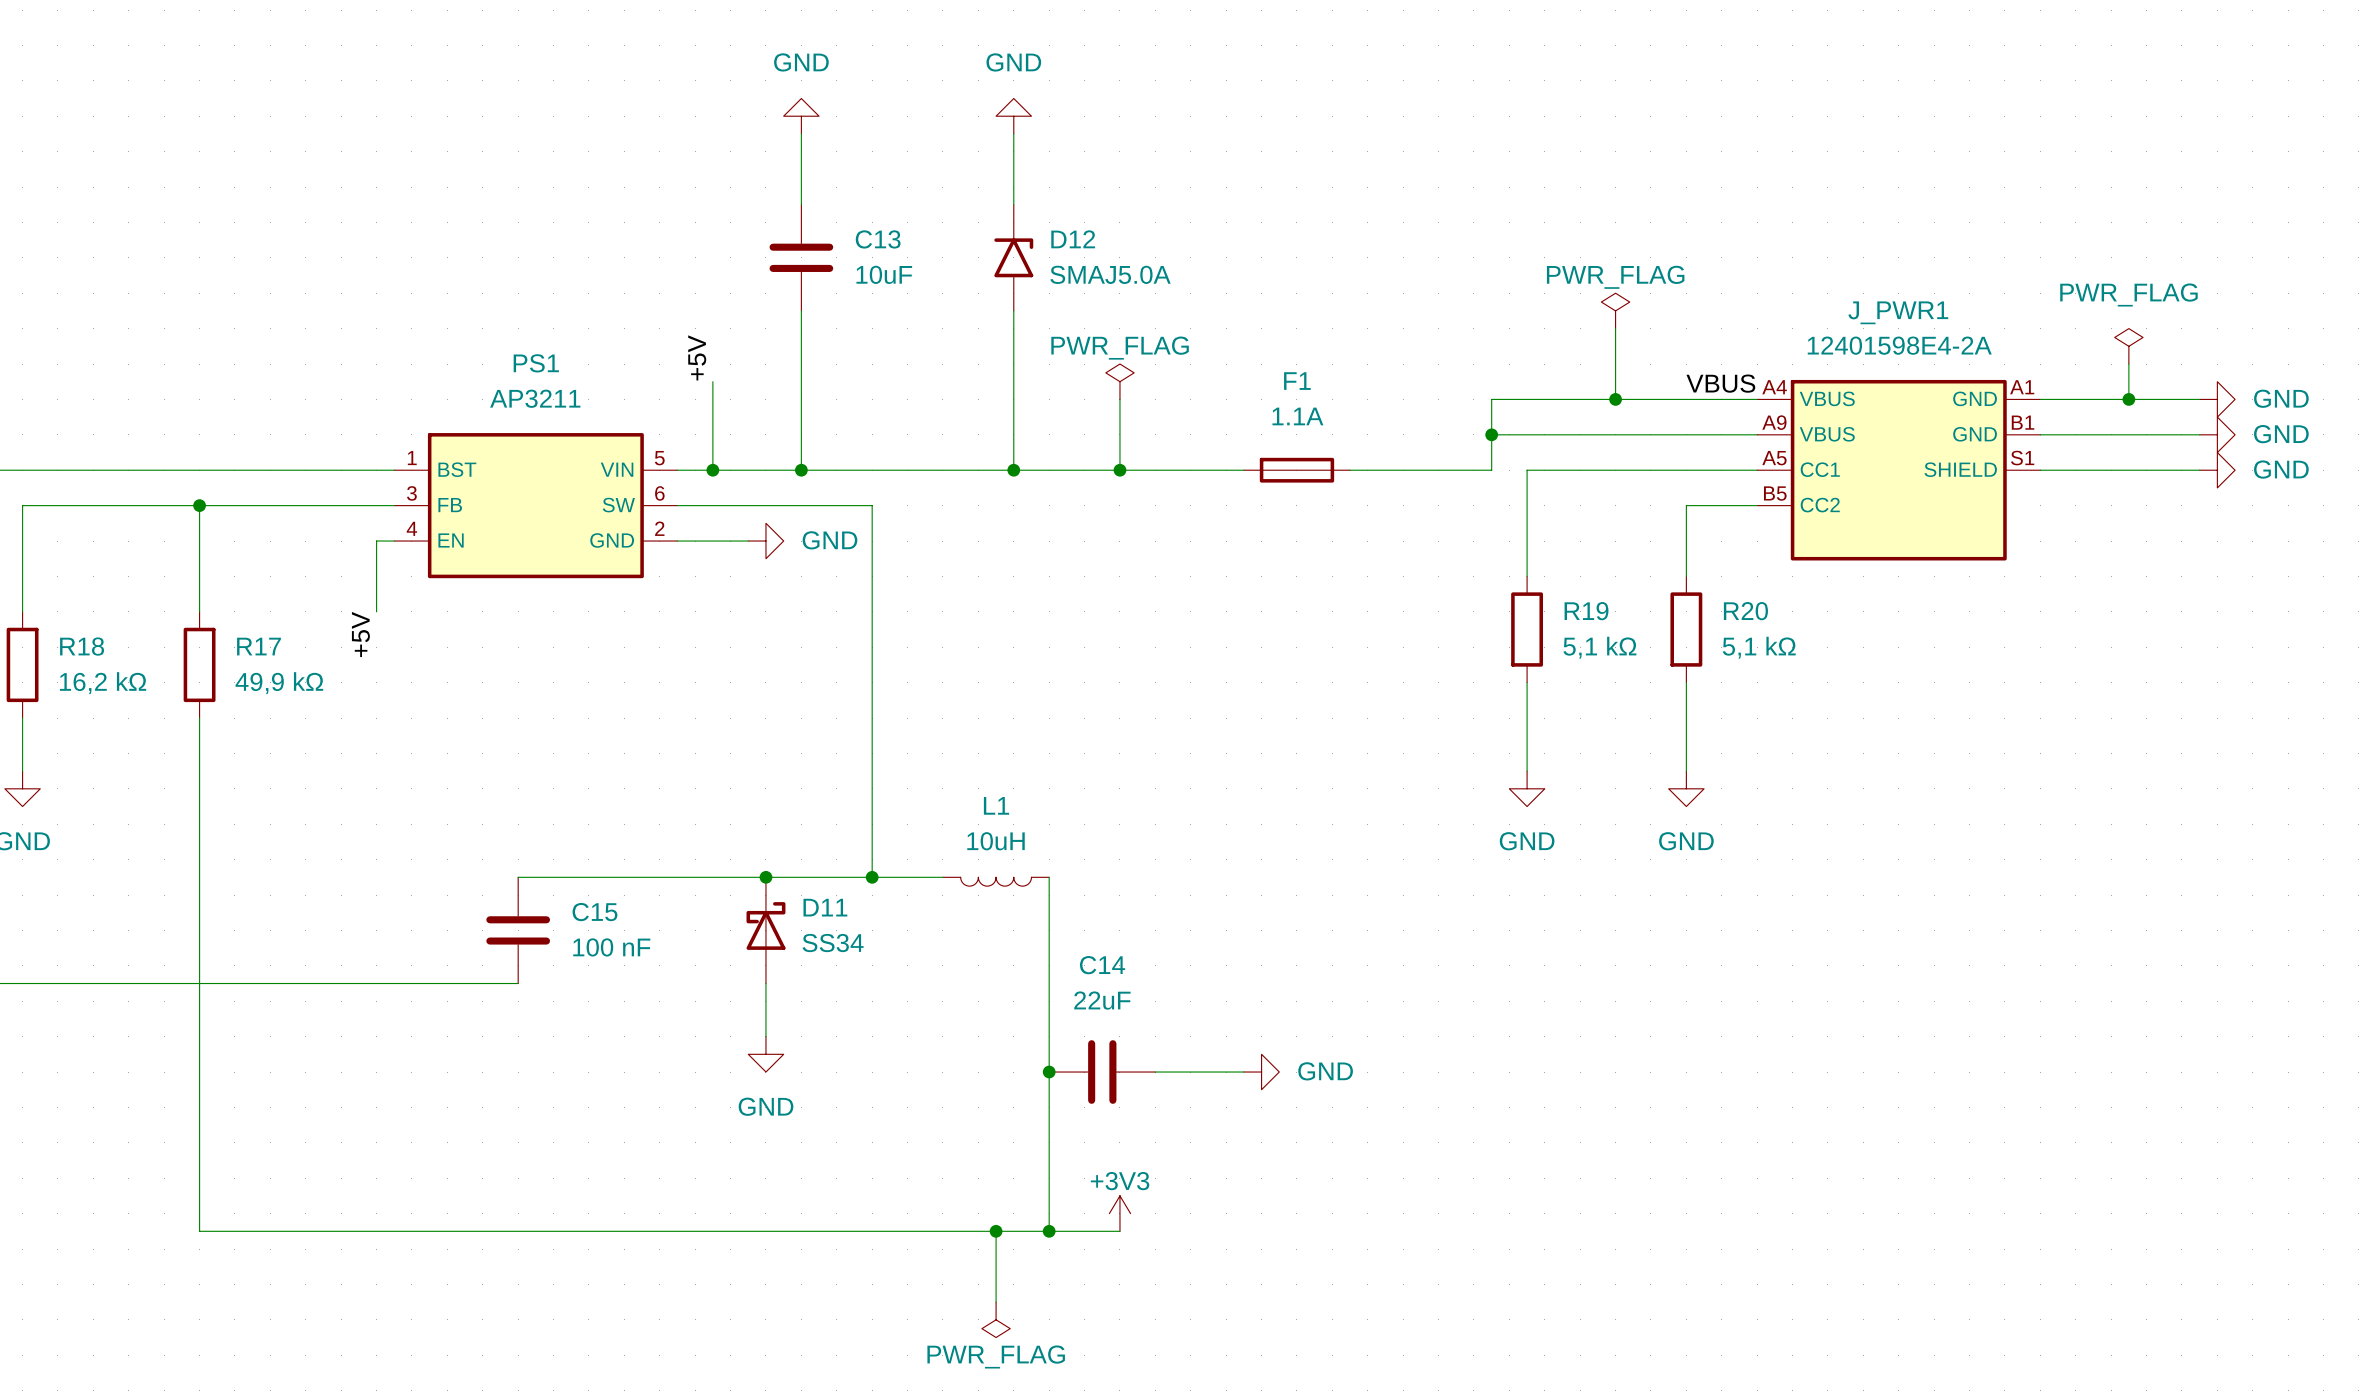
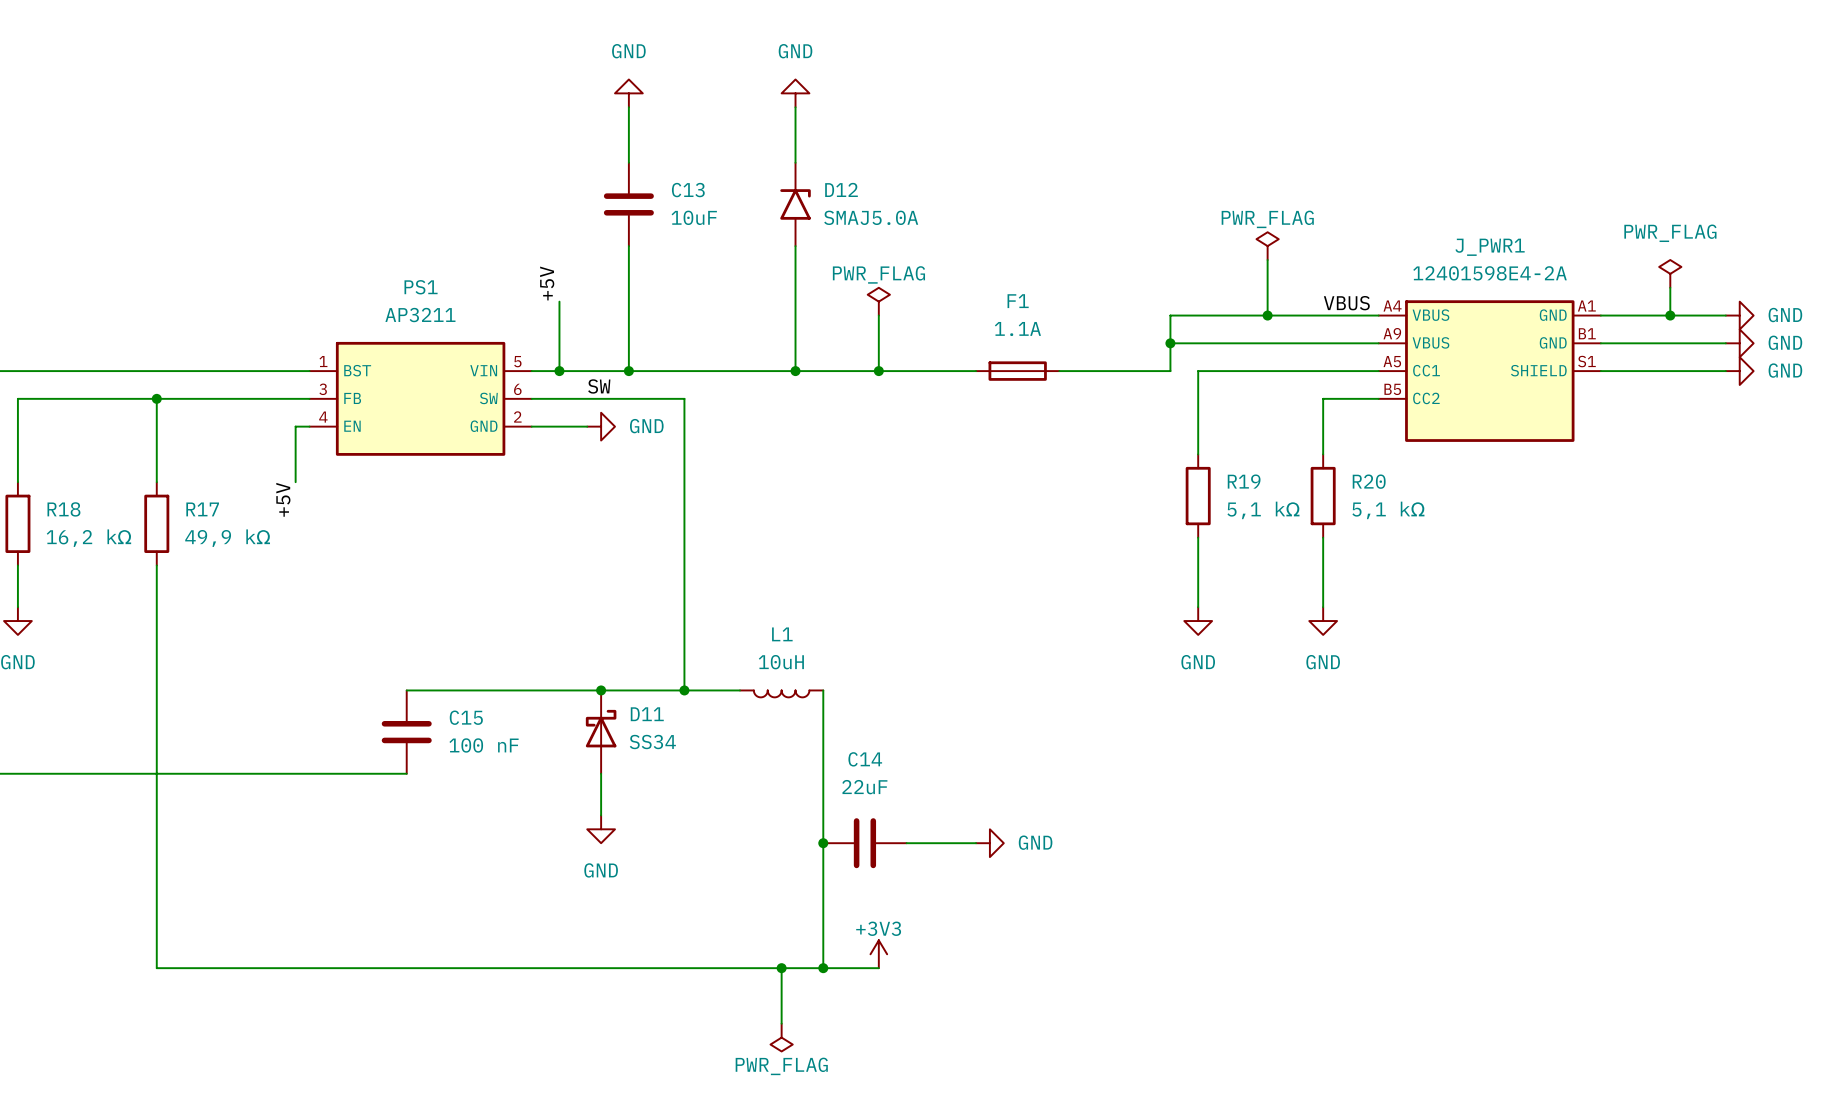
label: none -> SW (599, 386)

